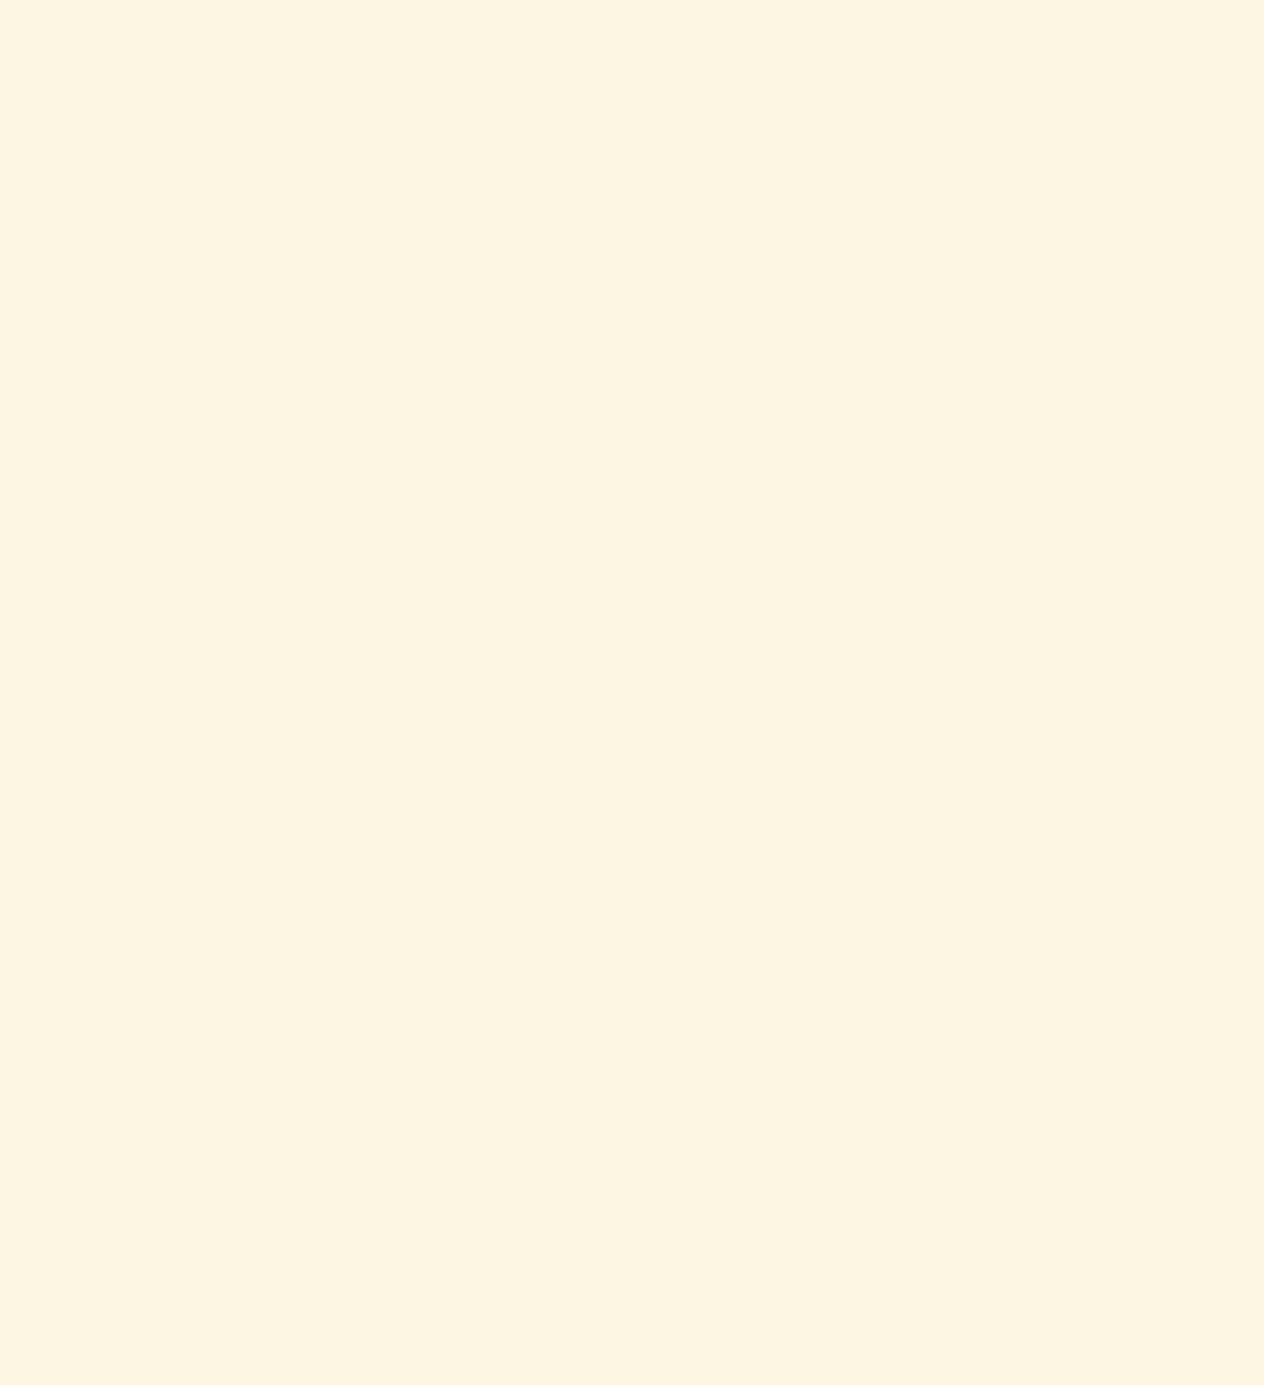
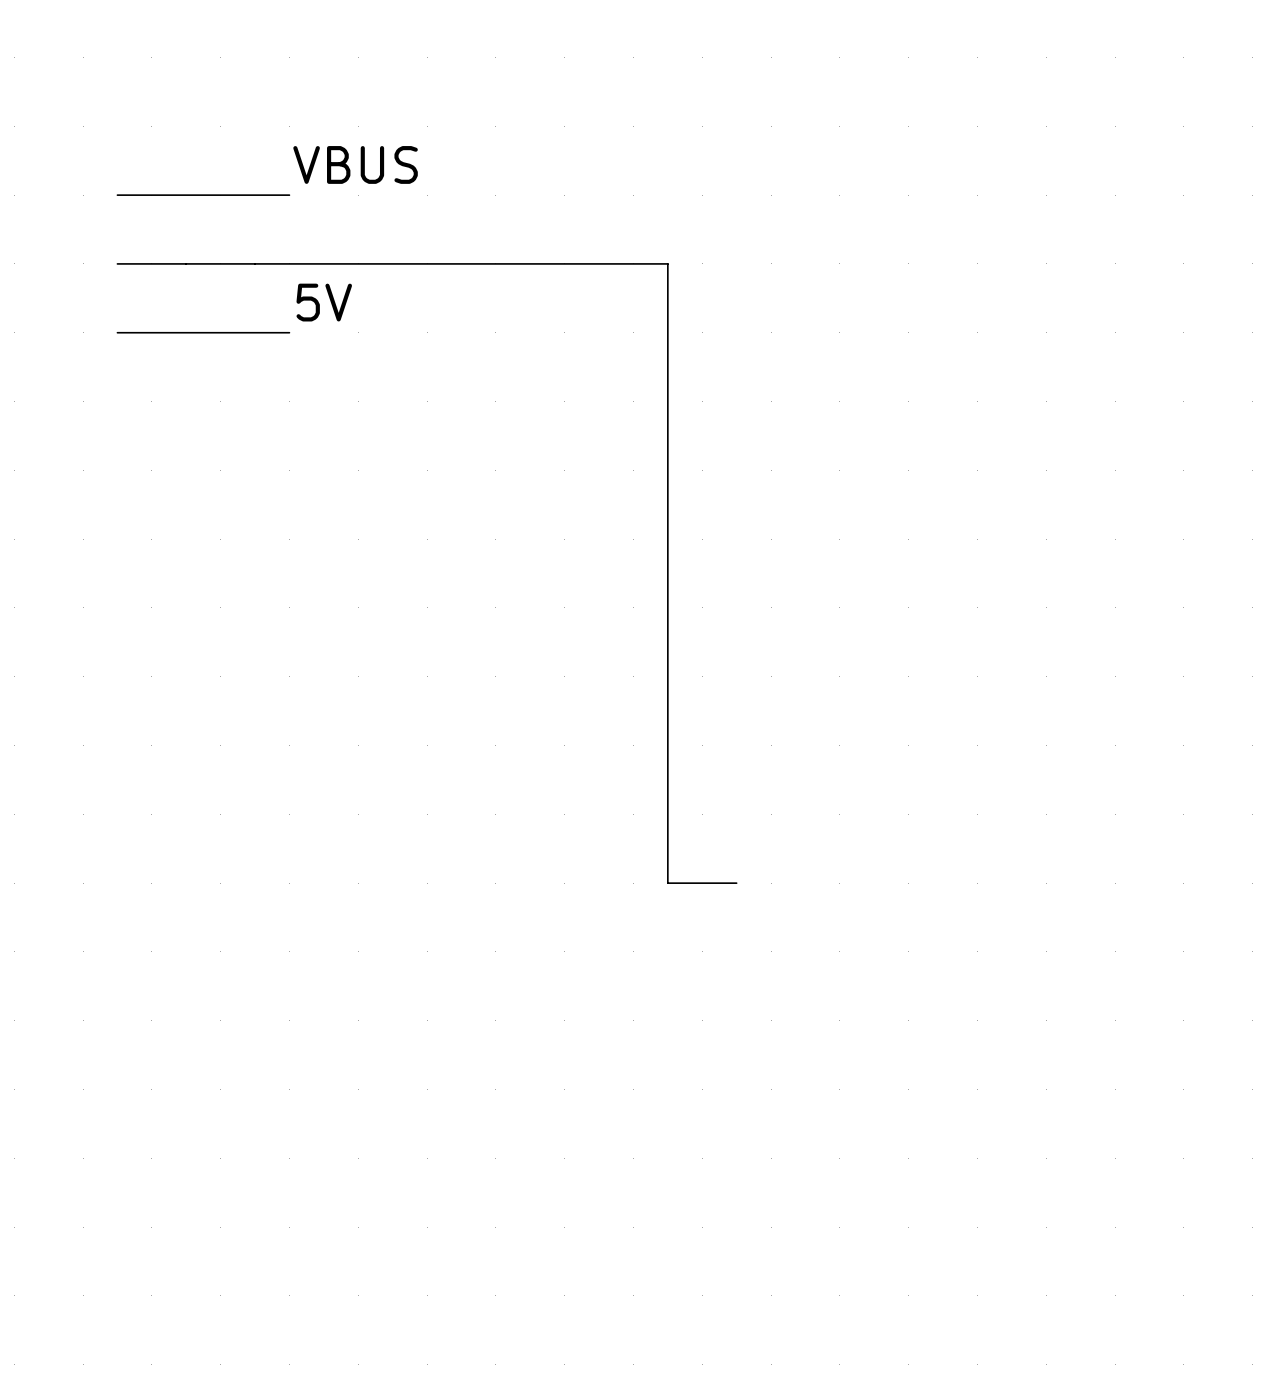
label: none -> VBUS (355, 164)
wire: none -> (117, 195) (289, 195)
wire: none -> (117, 263) (667, 263) (667, 883) (736, 883)
label: none -> 5V (324, 302)
wire: none -> (117, 332) (289, 332)

